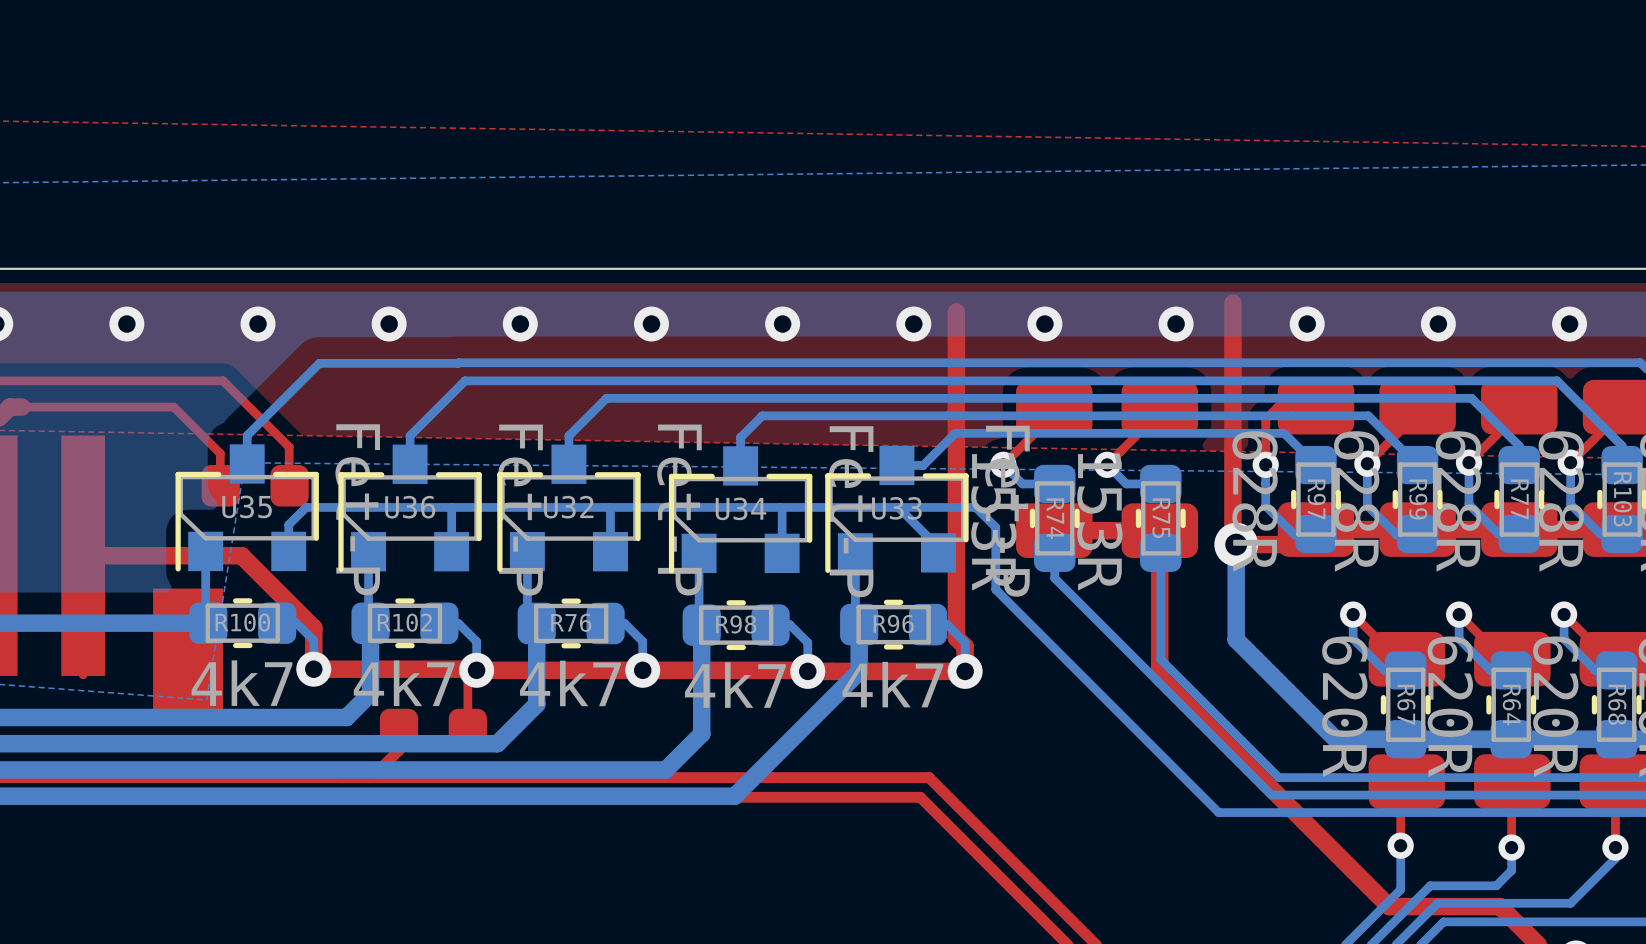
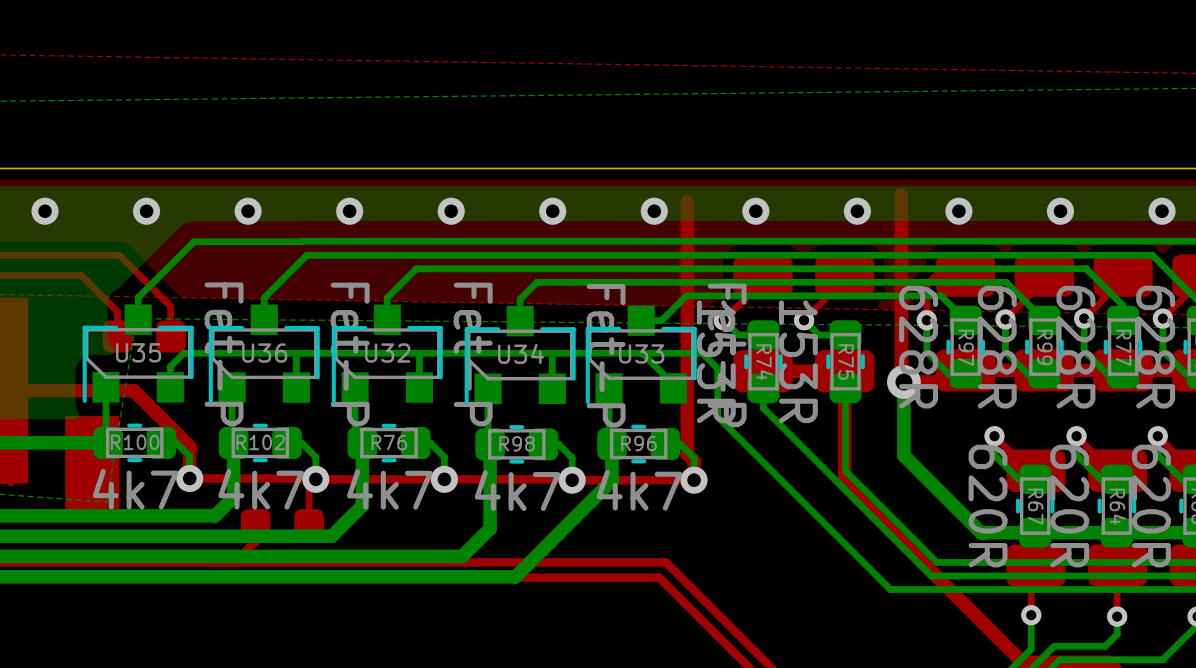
top track width: thick (475, 669) (313, 669) -> thin (314, 478) (189, 478)
top track width: thick (806, 670) (476, 670) -> thin (571, 479) (315, 479)
top track width: thick (965, 671) (807, 671) -> thin (694, 480) (572, 480)

